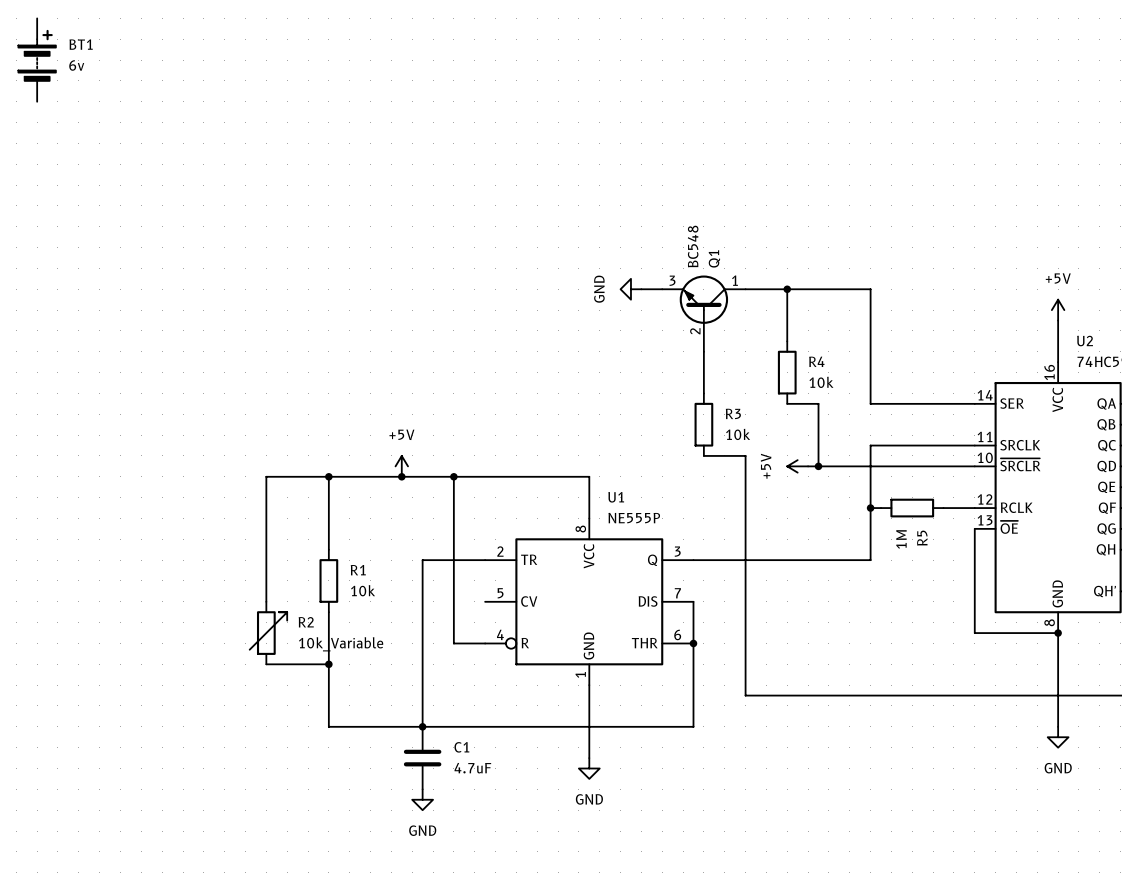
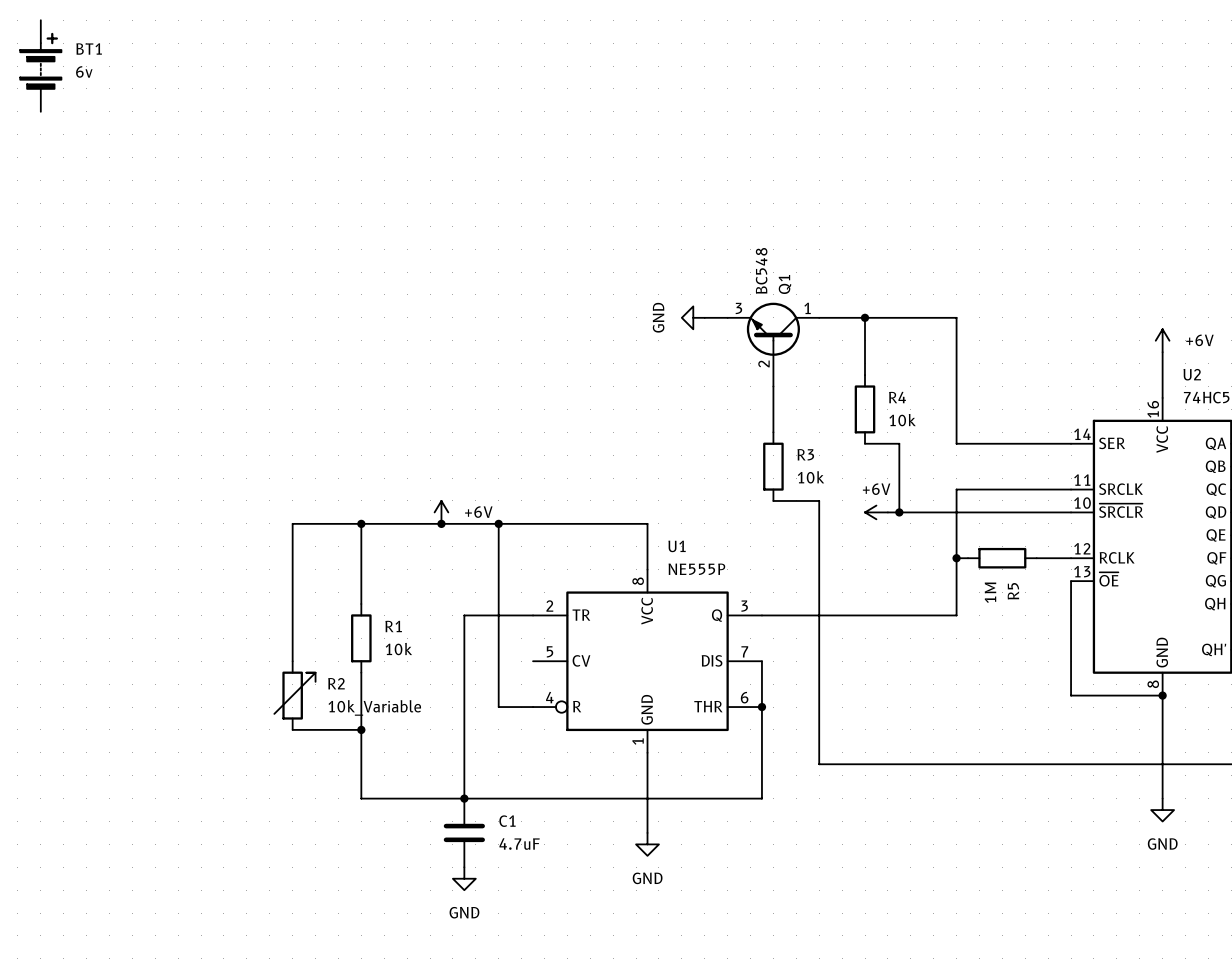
power symbol: +5V (1058, 310) -> +6V (1162, 340)
power symbol: +5V (401, 466) -> +6V (441, 512)
power symbol: +5V (797, 466) -> +6V (876, 512)

